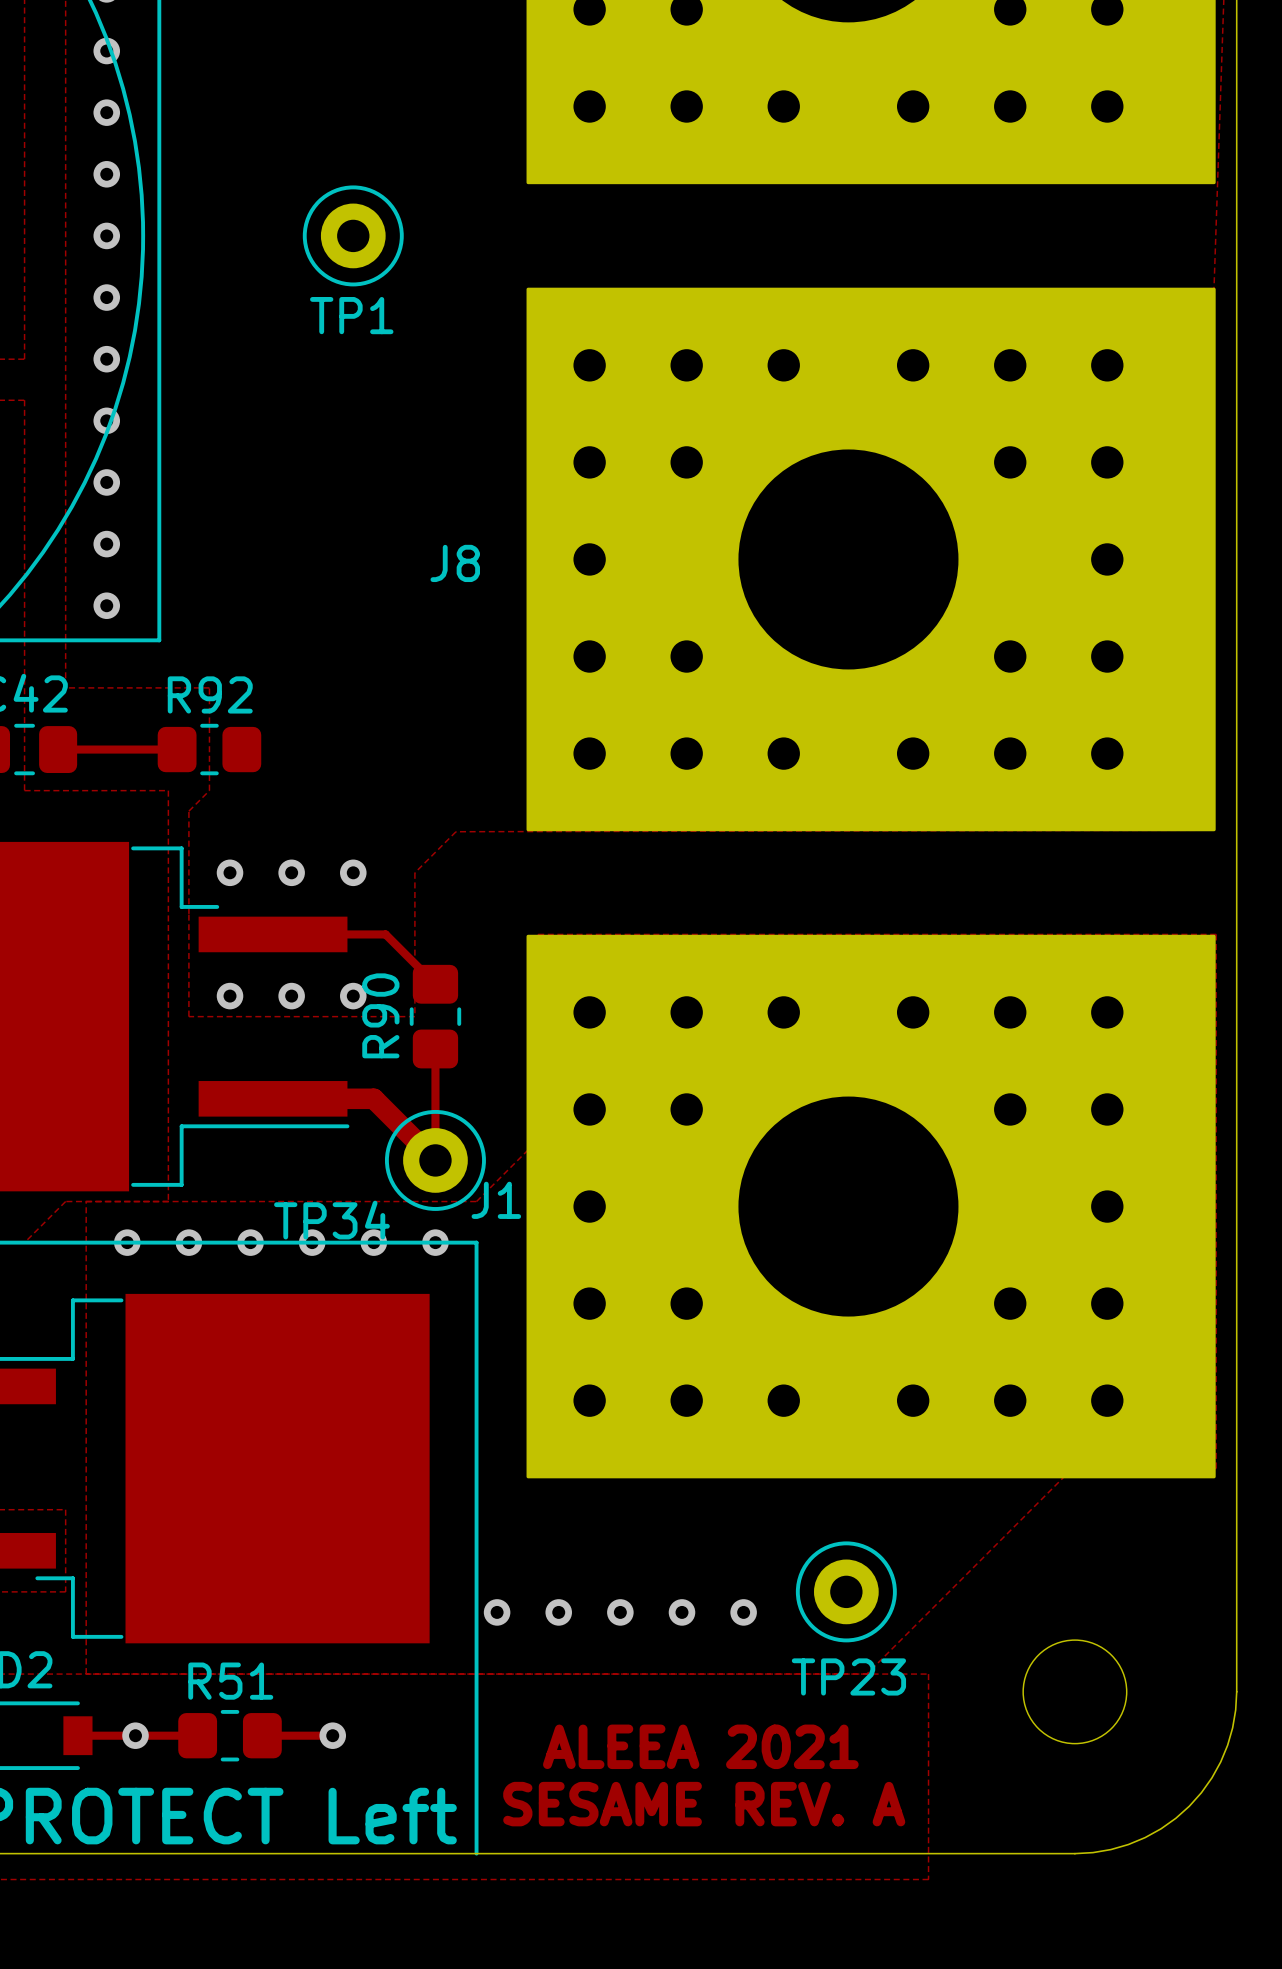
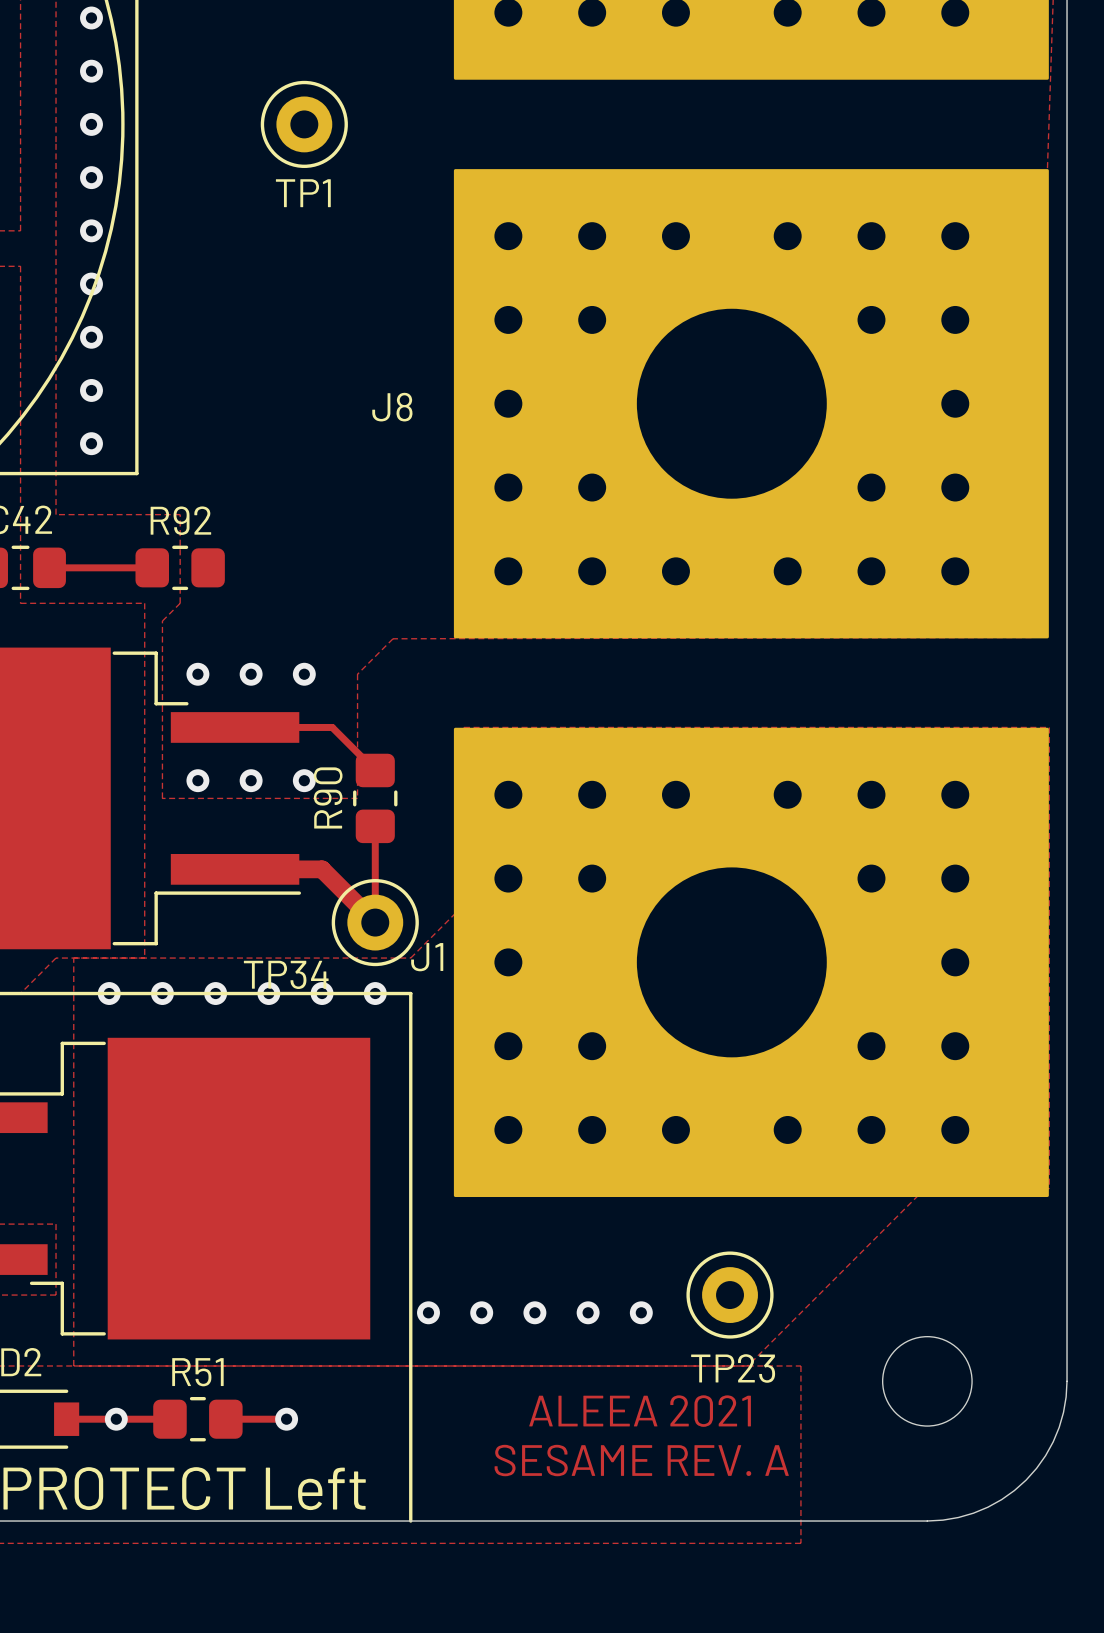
text position: ALEEA 2021 (700, 1746) -> ALEEA 2021 (640, 1411)
text position: SESAME REV. A (704, 1804) -> SESAME REV. A (641, 1460)

